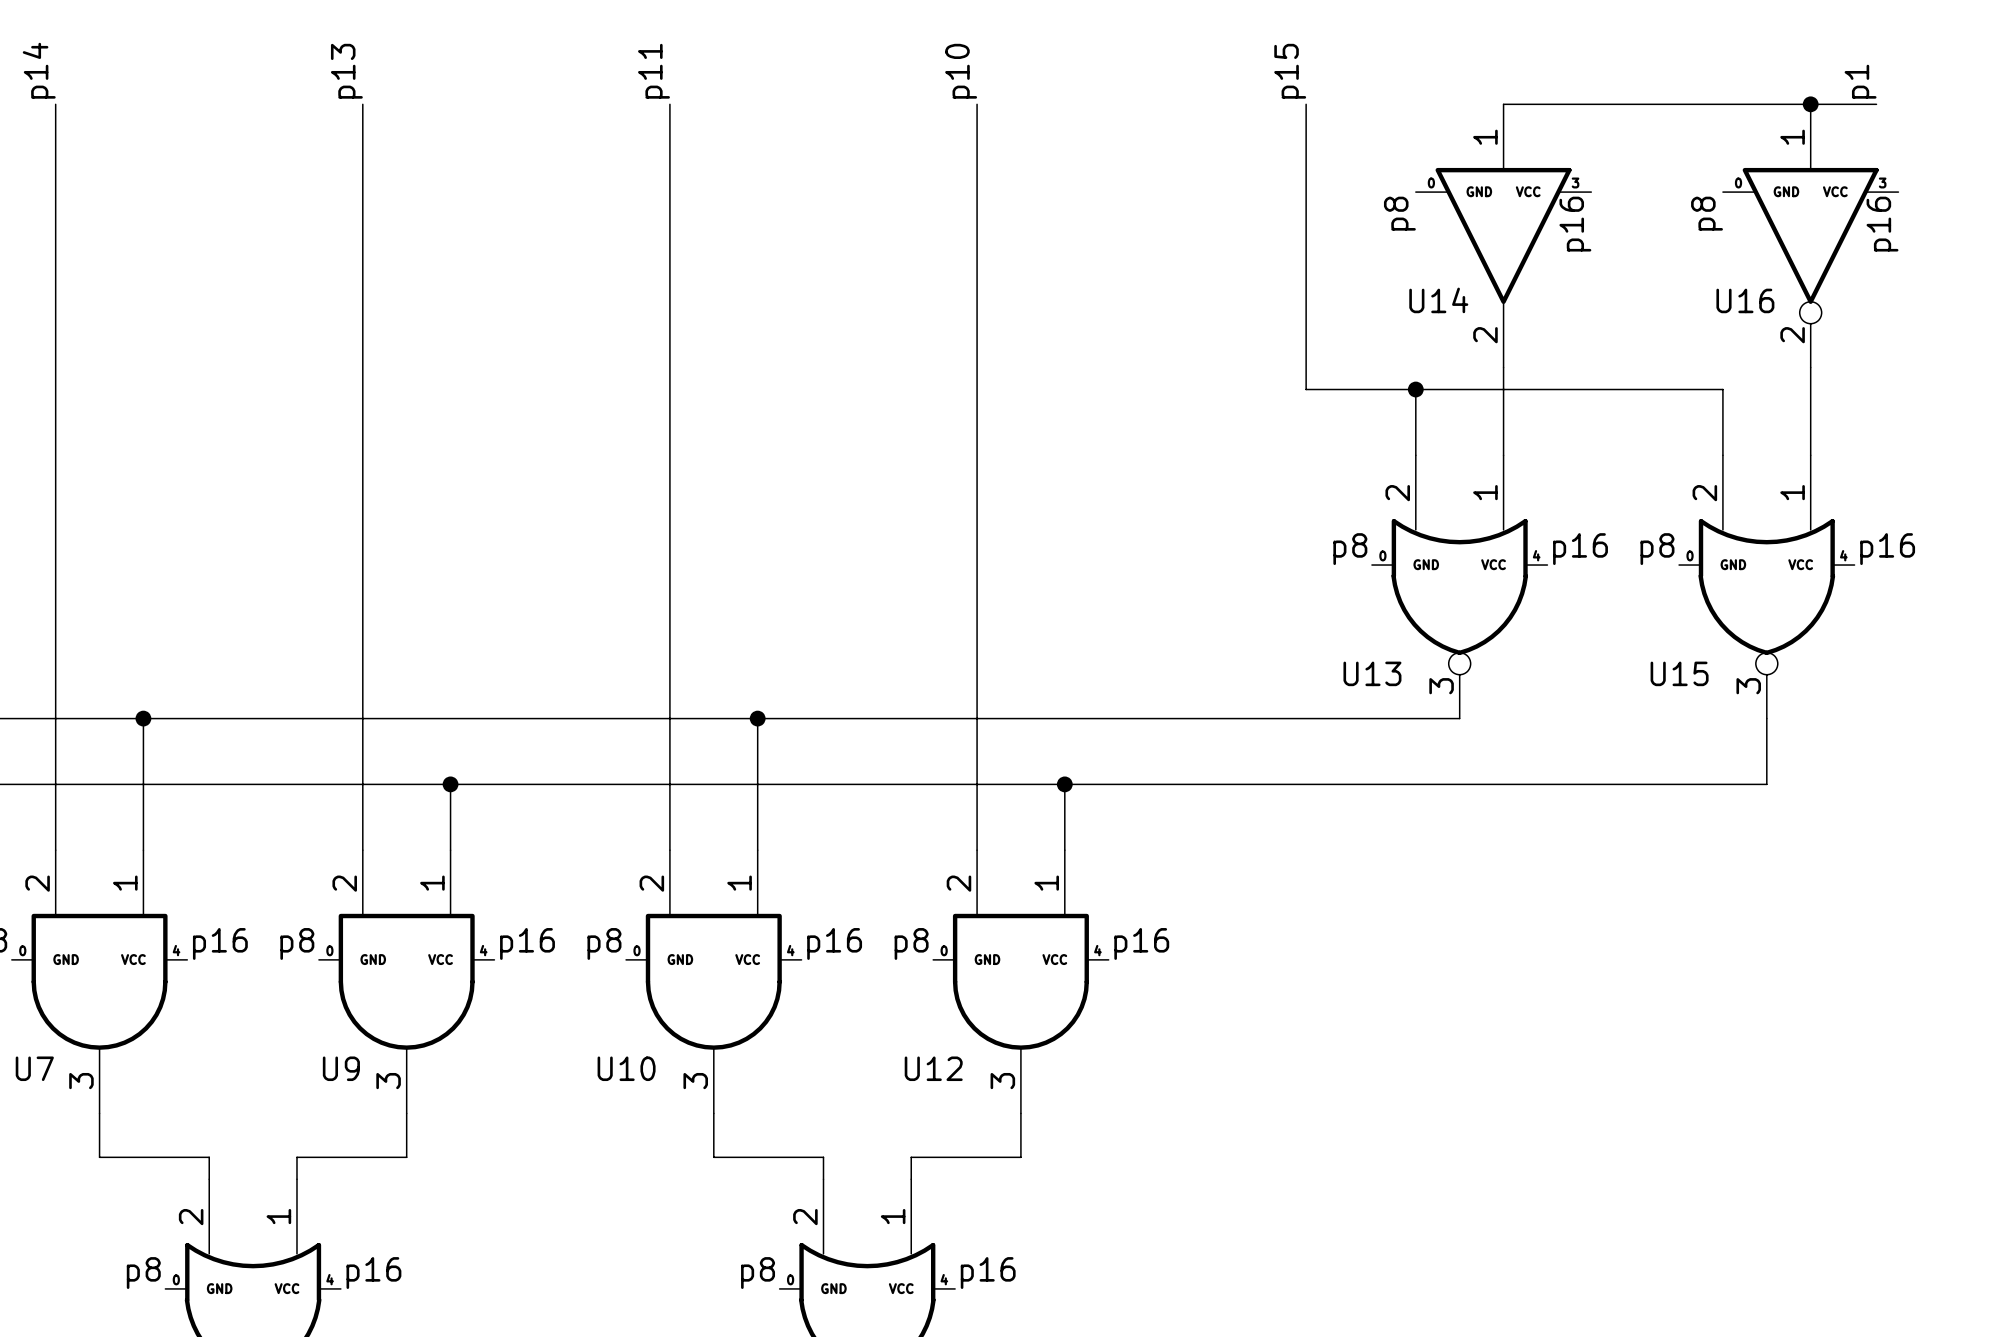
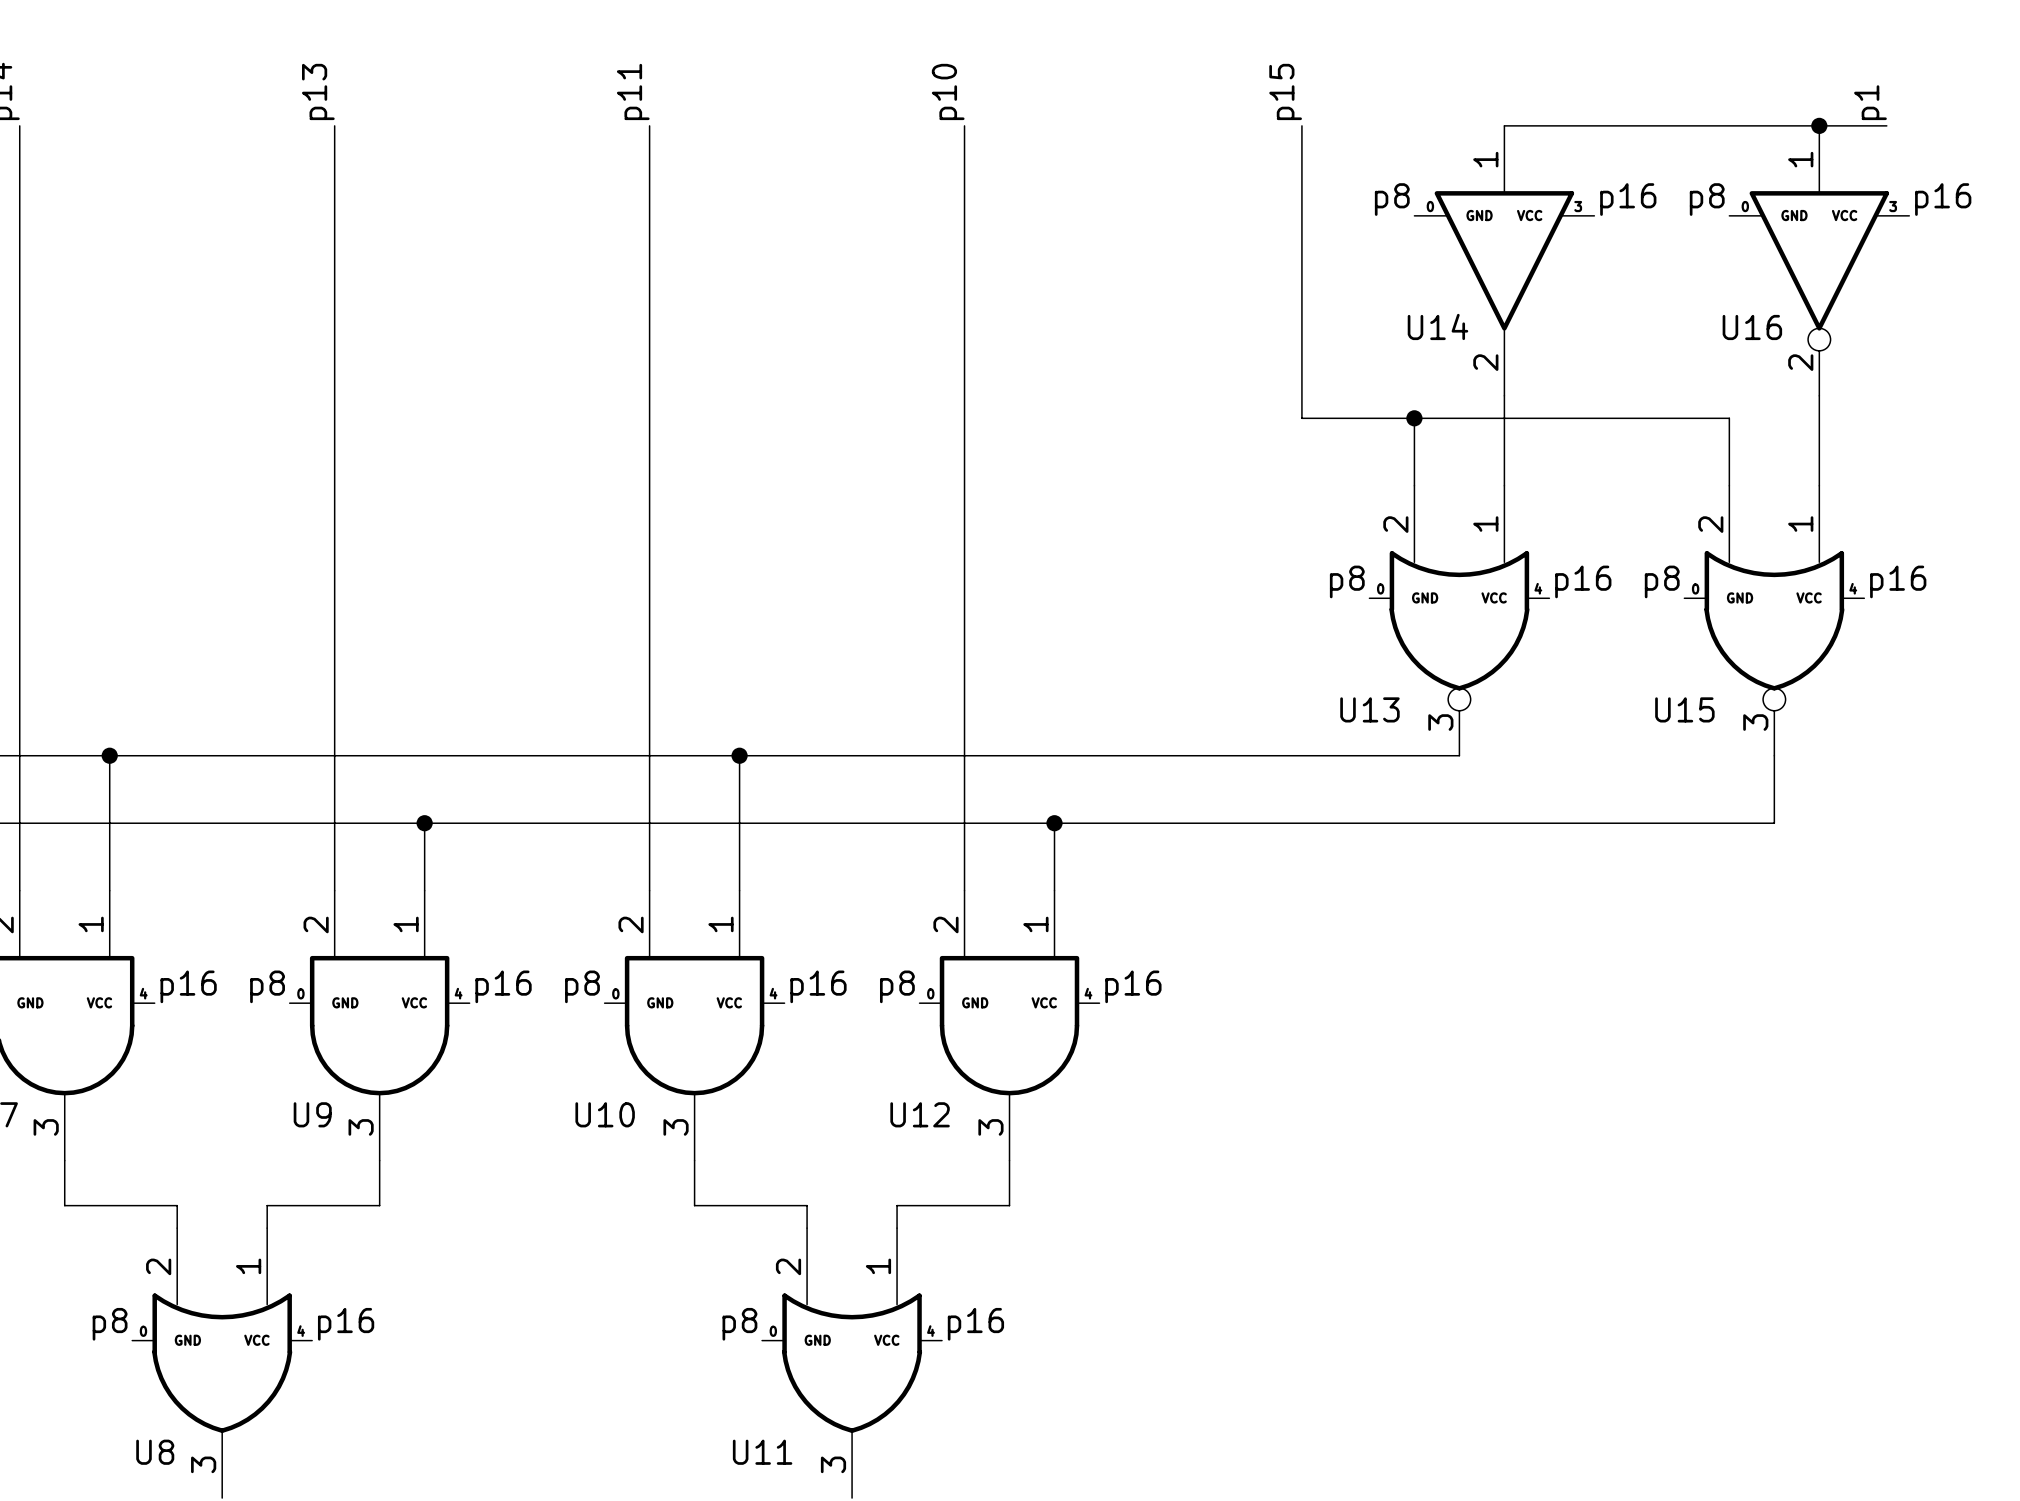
label rotation: 0° (1399, 213) -> 90° clockwise (1392, 199)
label rotation: 0° (1707, 213) -> 90° clockwise (1707, 199)
label rotation: 0° (1575, 224) -> 90° clockwise (1628, 199)
label position: p16 (1575, 224) -> p16 (1628, 199)
label rotation: 0° (1882, 224) -> 90° clockwise (1943, 199)
label position: p16 (1882, 224) -> p16 (1943, 199)

